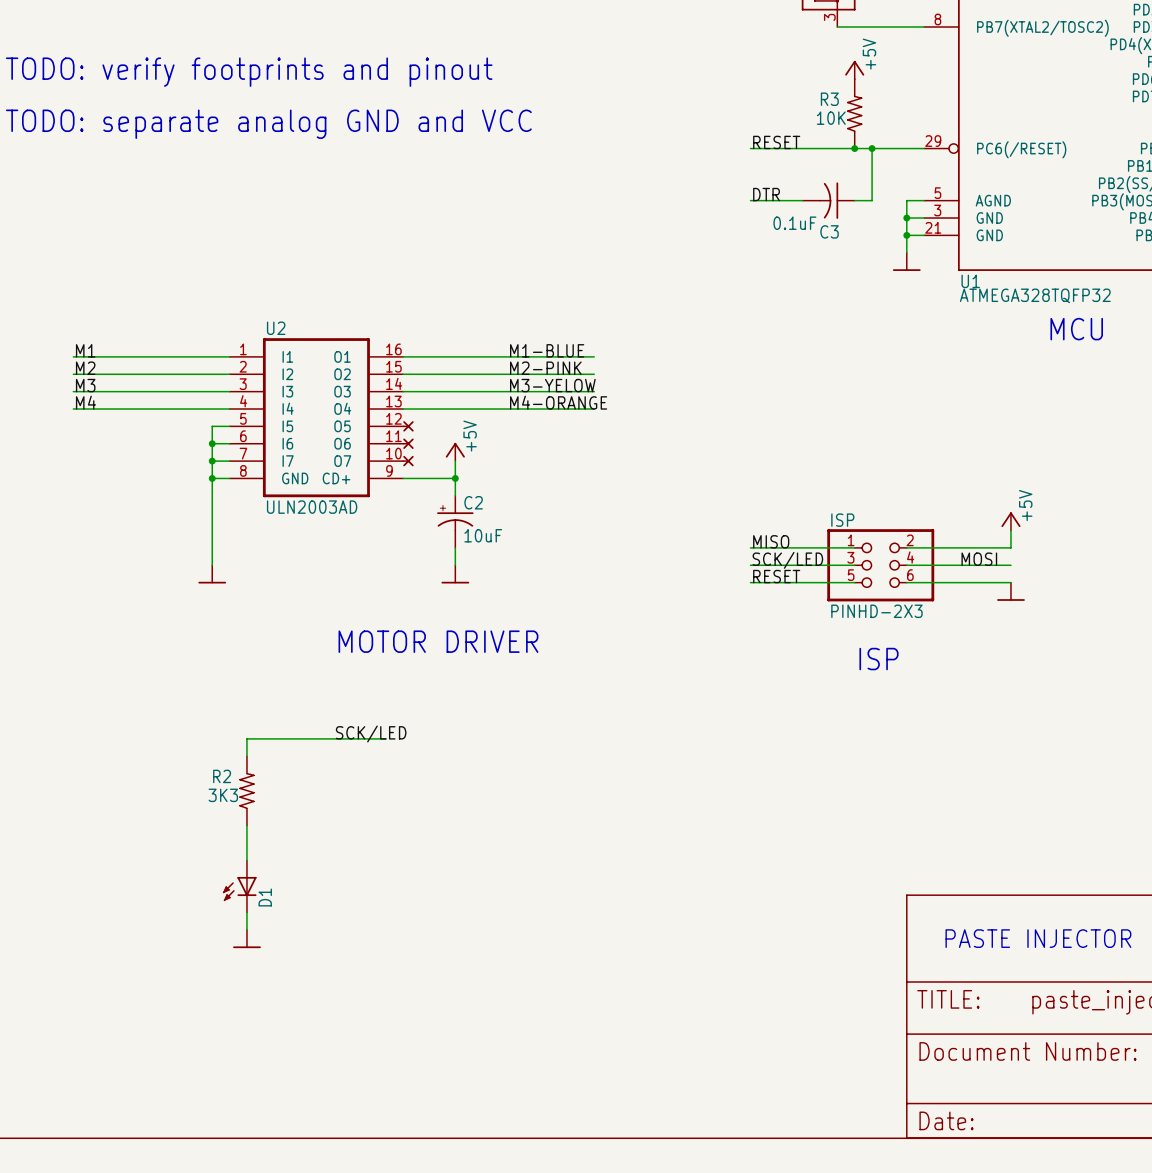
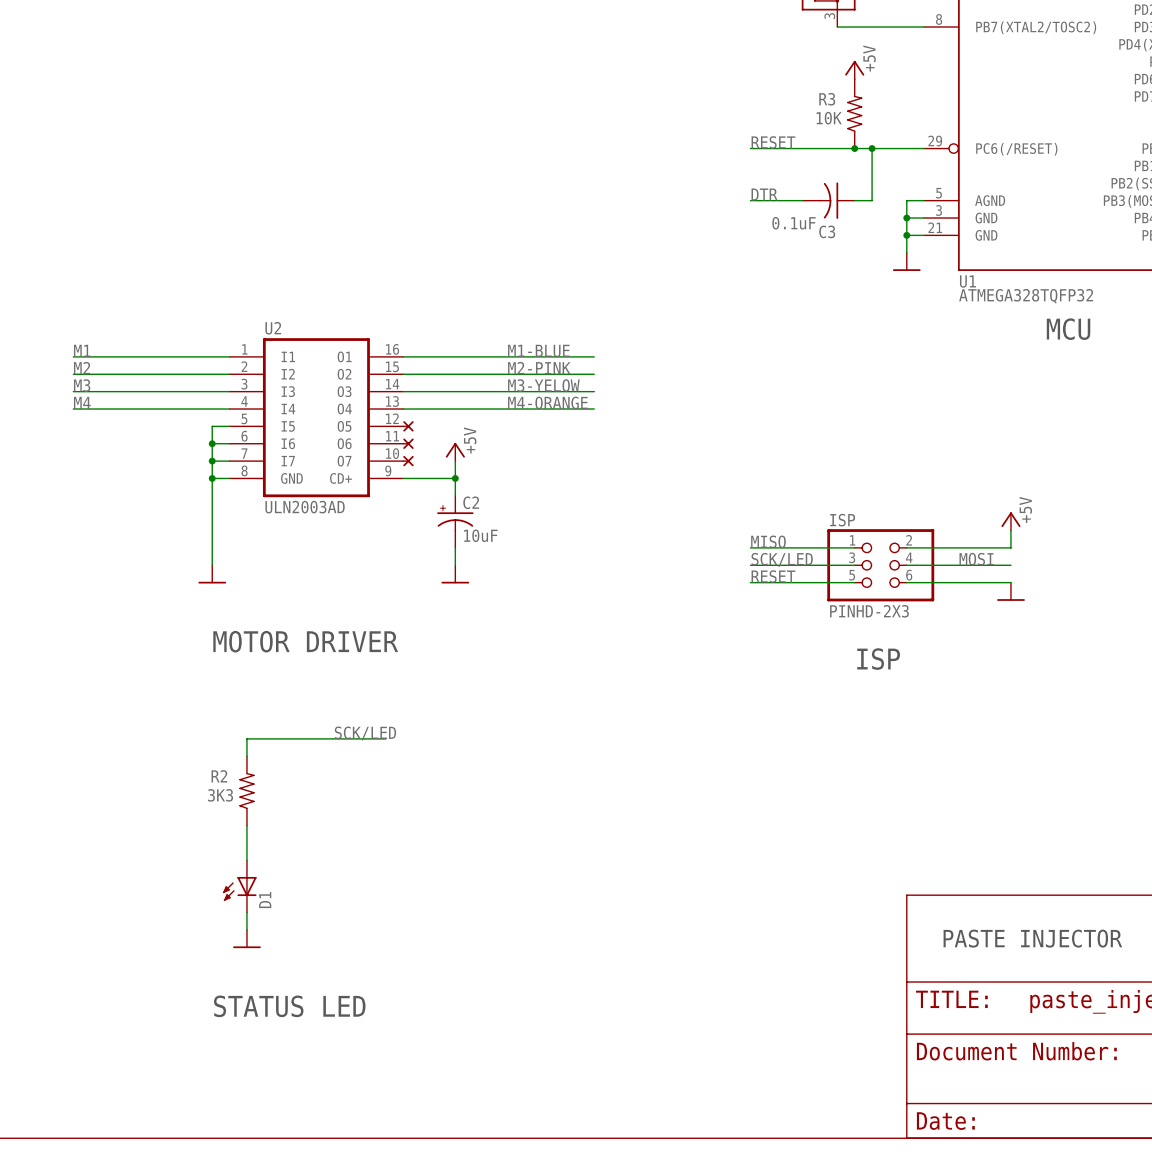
text: TODO: verify footprints and pinout (249, 72) -> none
text: TODO: separate analog GND and VCC (268, 124) -> none
text position: MOTOR DRIVER (438, 641) -> MOTOR DRIVER (305, 641)
text: none -> STATUS LED (289, 1006)

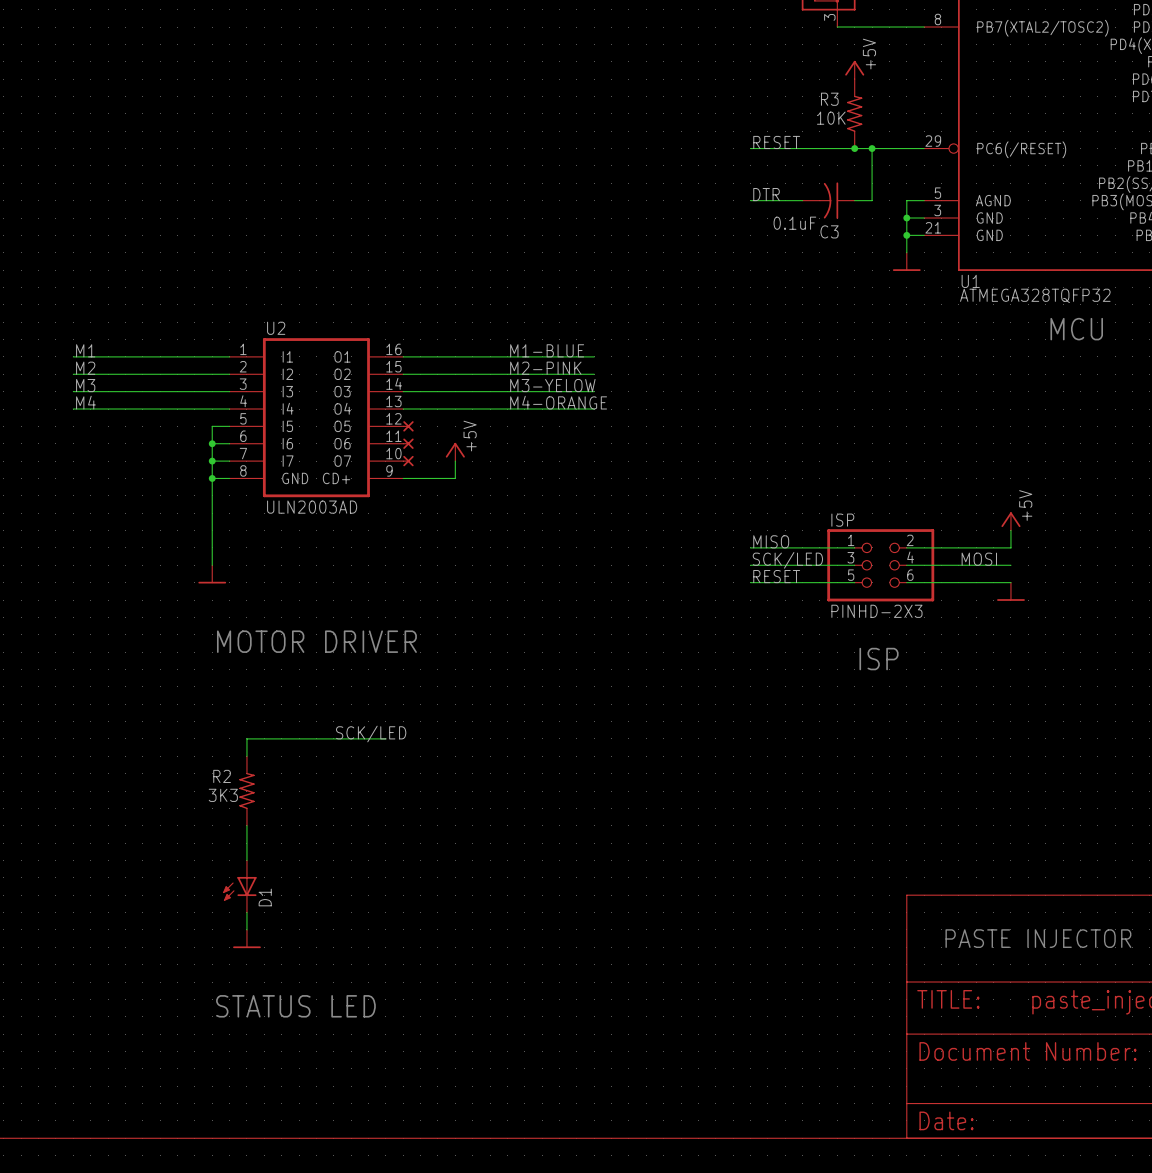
wire: (455, 478) (455, 495) -> none
junction: (455, 478) -> none
C2: 10uF (455, 521) -> none
wire: (455, 547) (455, 565) -> none
power symbol: (455, 574) -> none

